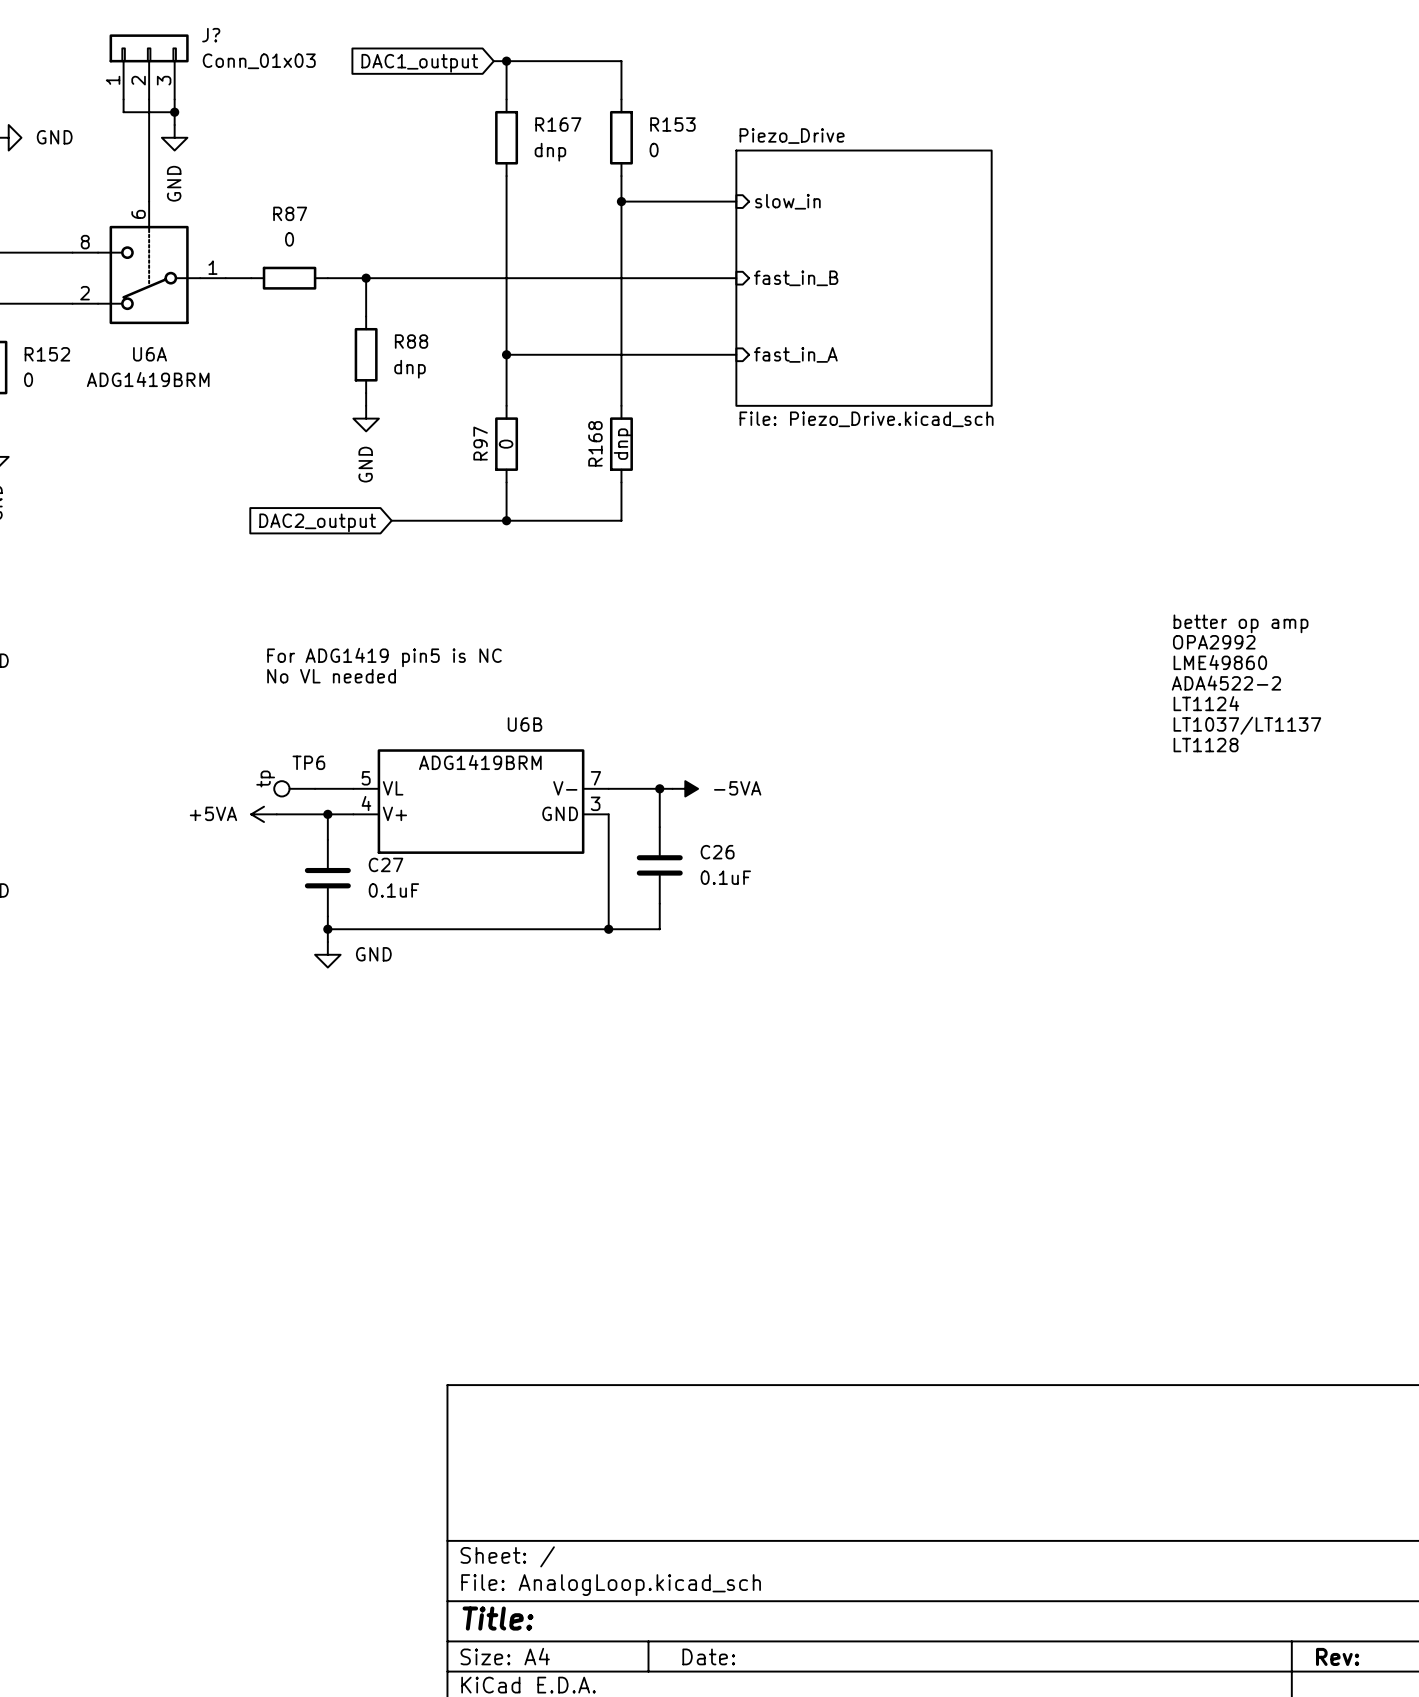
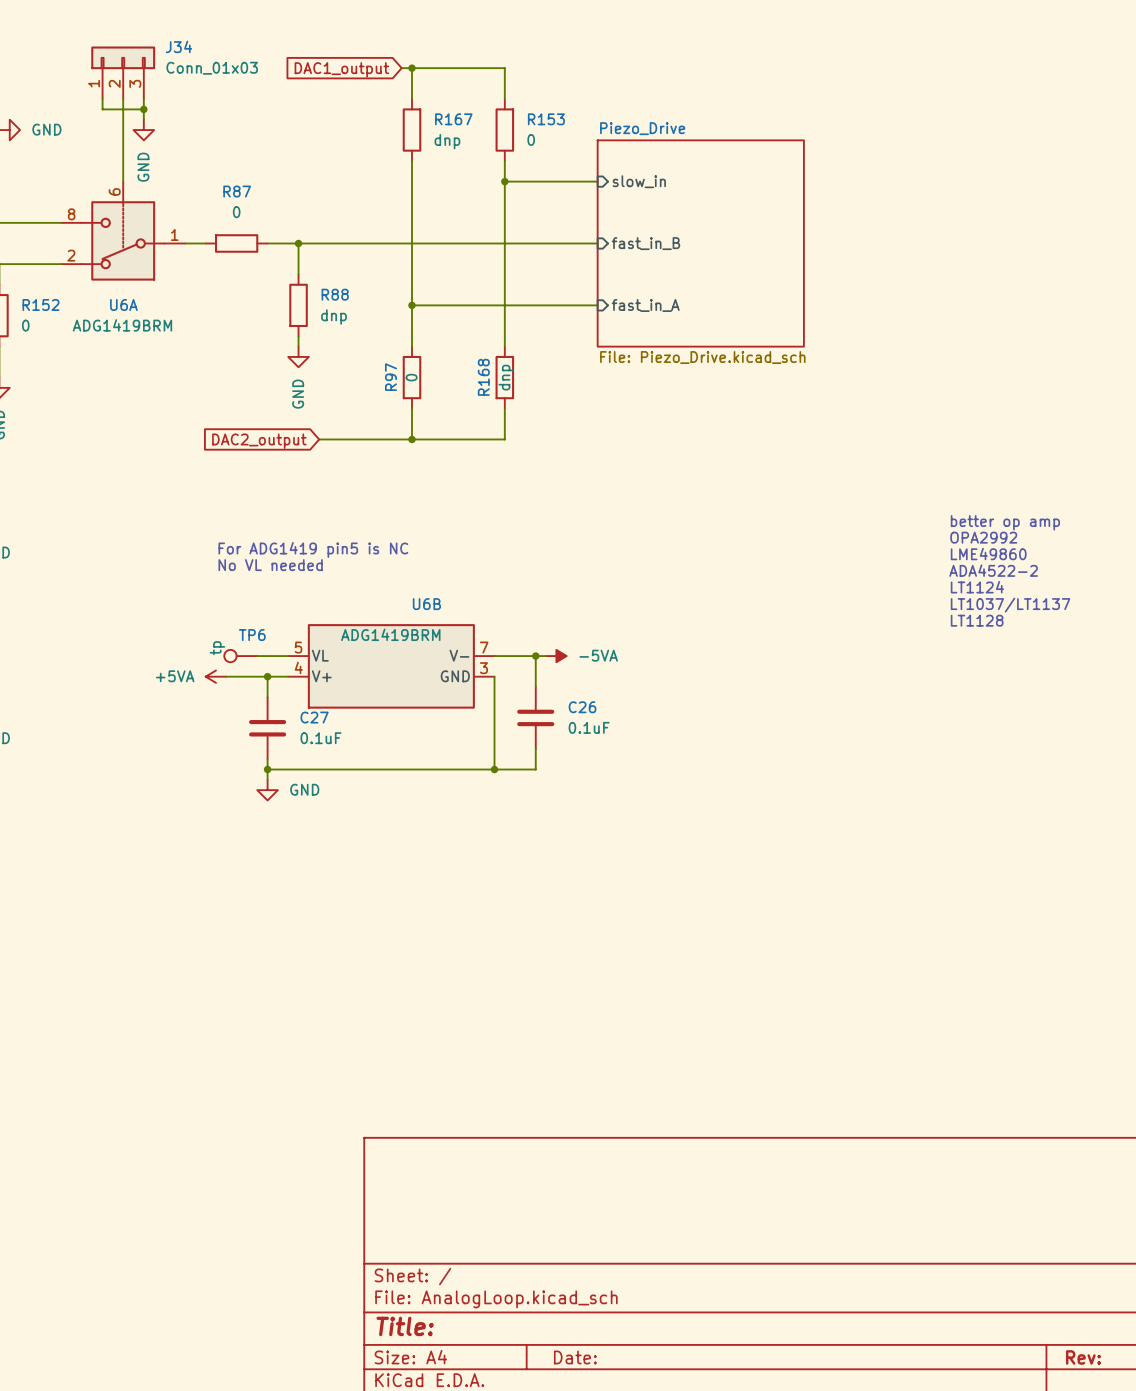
J? name: J? (211, 35) -> J34 (179, 46)

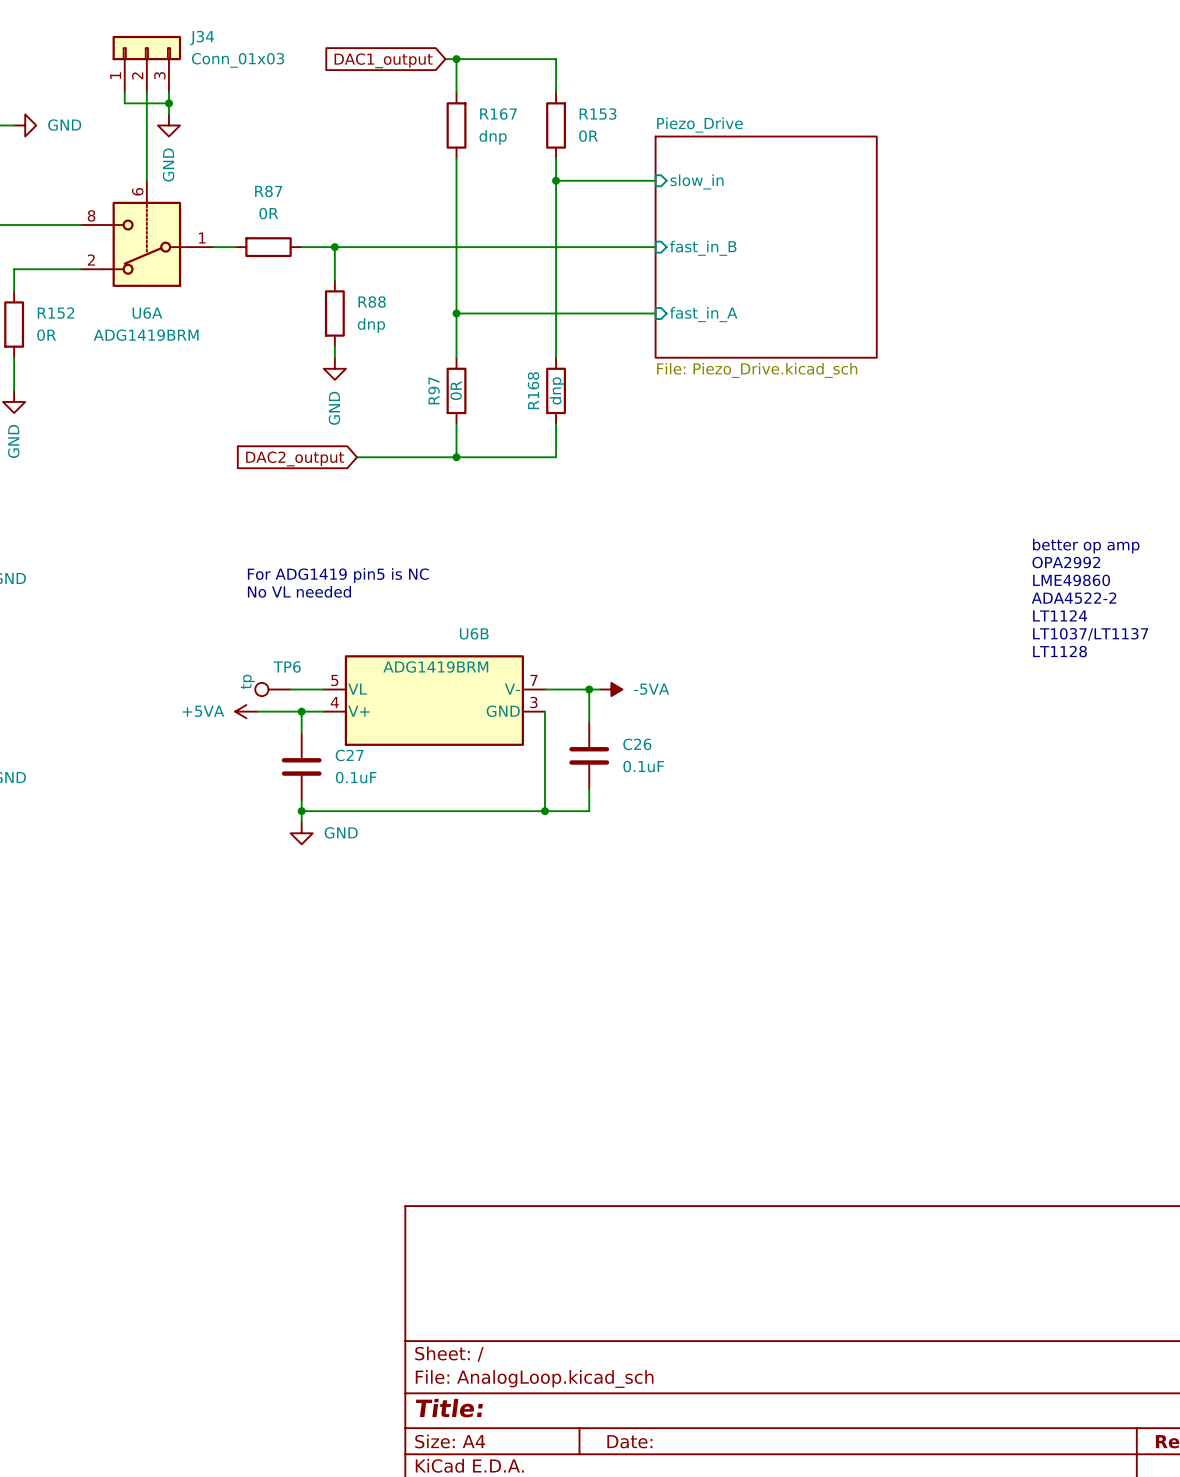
R153 value: 0 (531, 139) -> 0R (588, 136)
R87 value: 0 (236, 212) -> 0R (268, 213)
R152 value: 0 (25, 325) -> 0R (46, 335)
R97 value: 0 (411, 377) -> 0R (456, 390)

